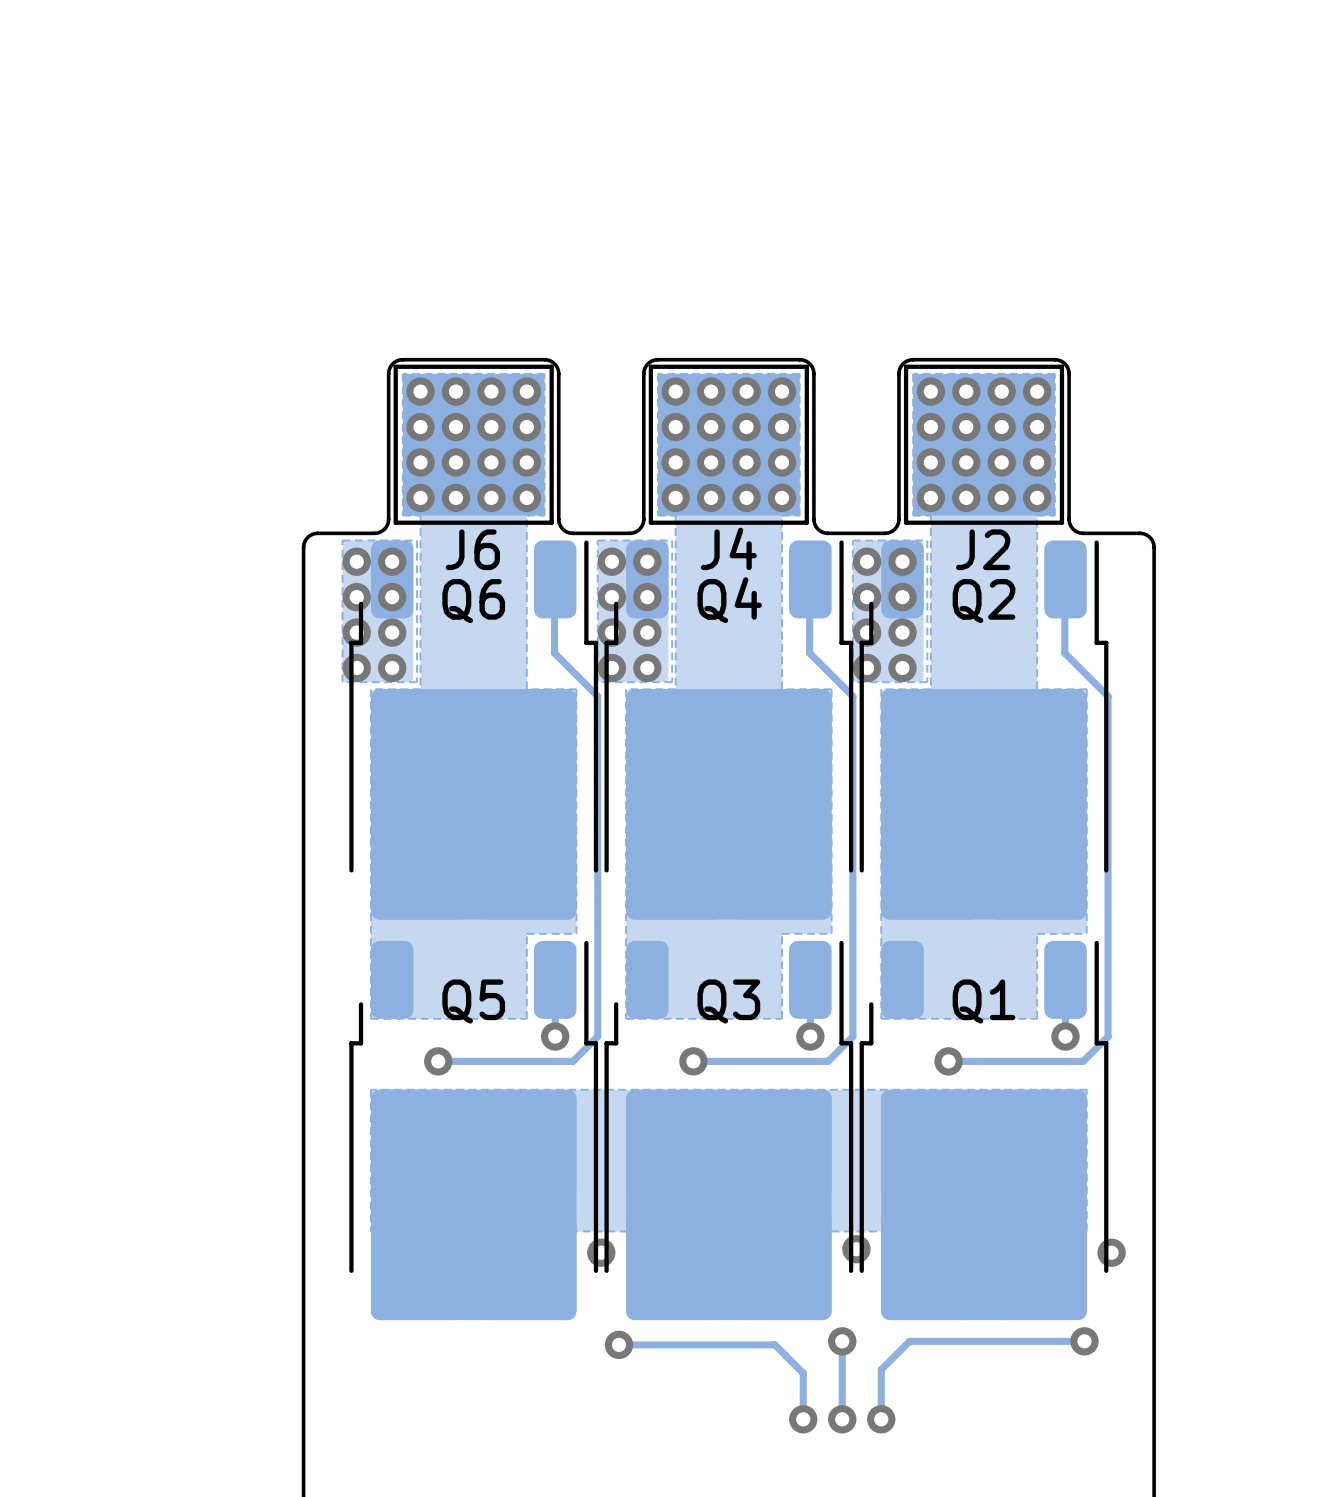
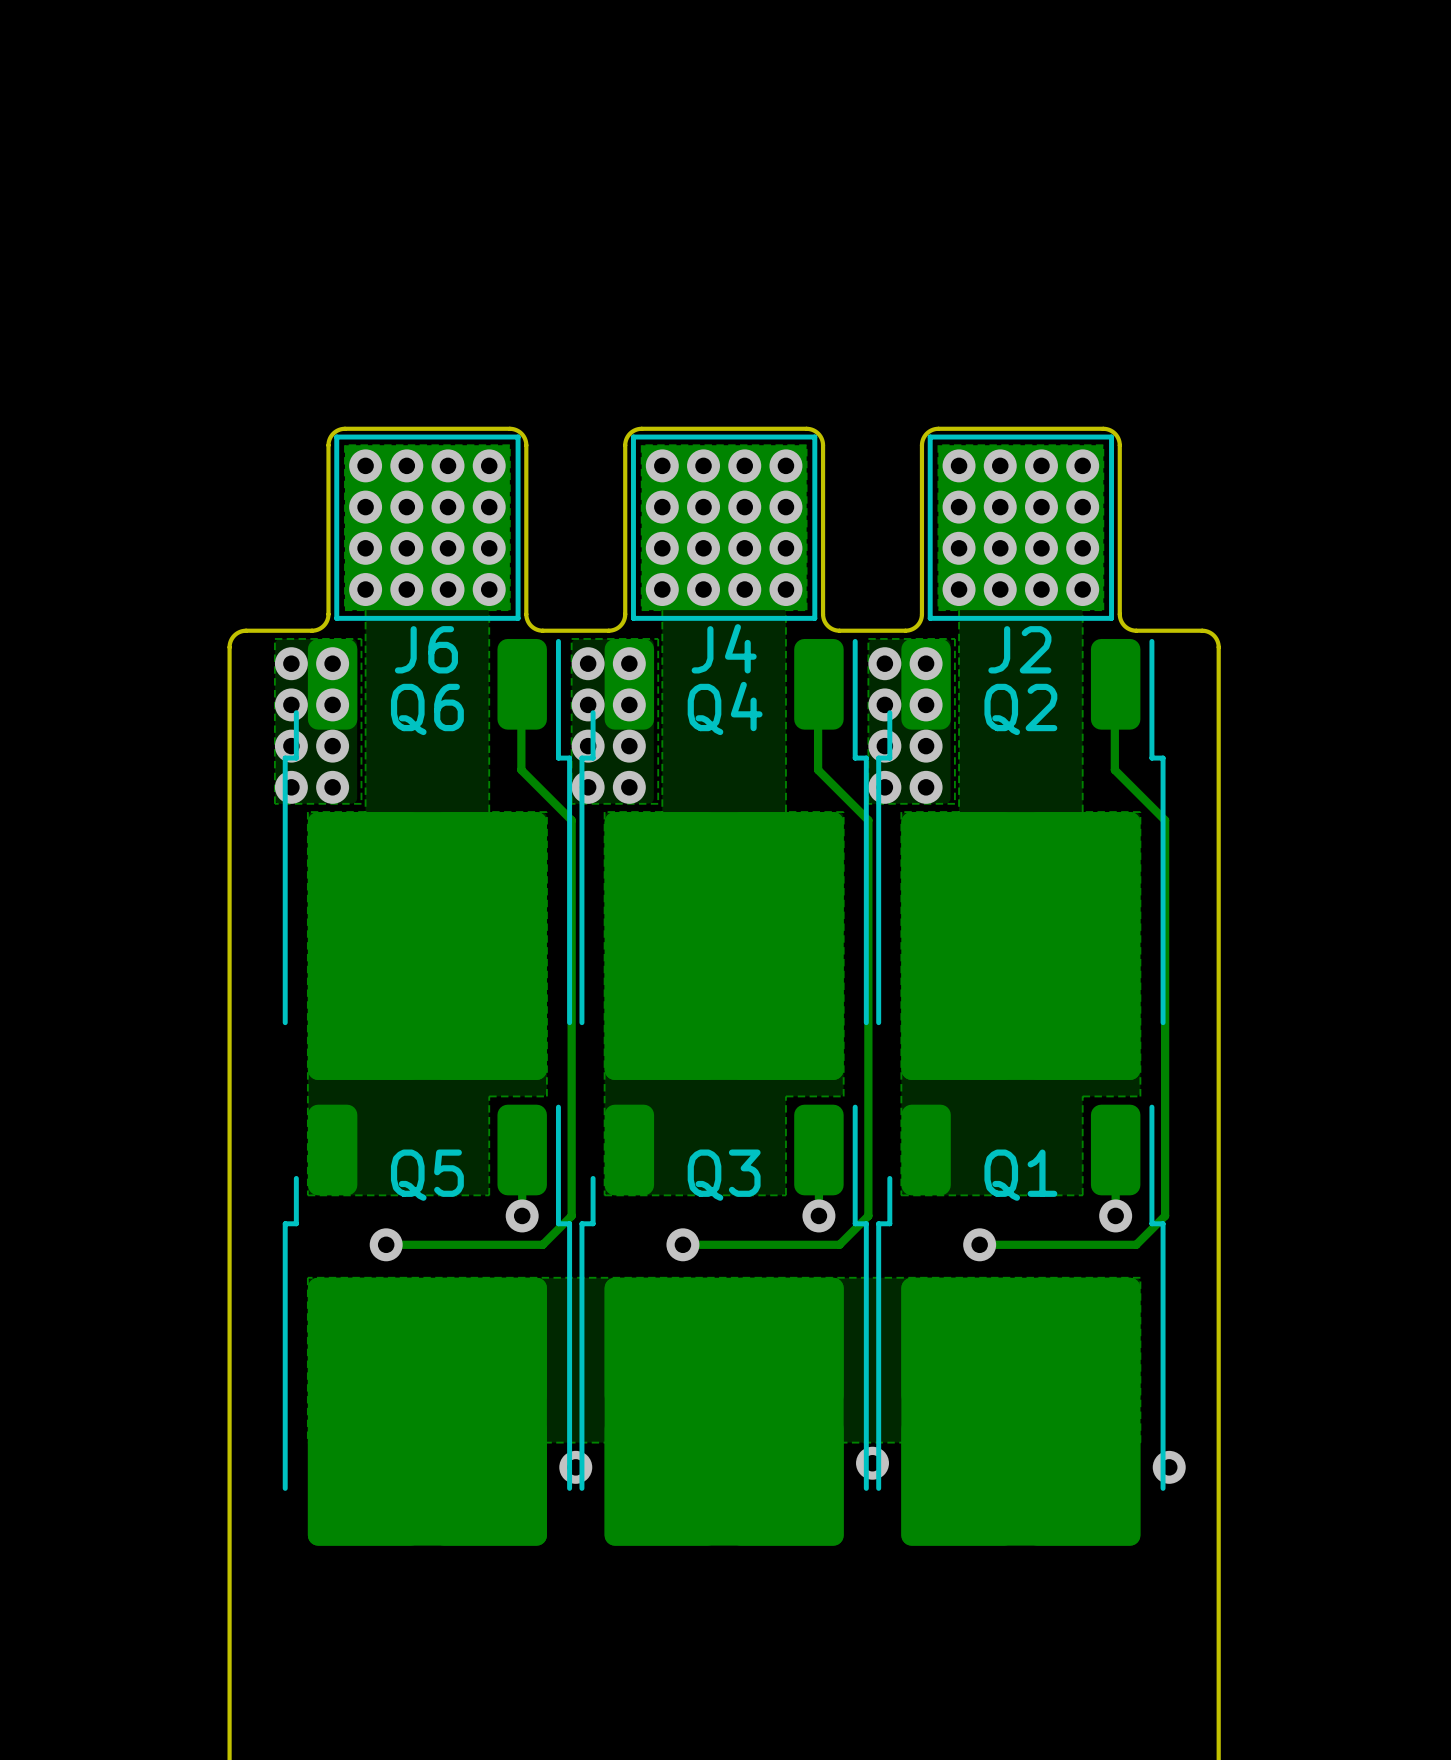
track: (842, 1341) (842, 1419) -> none
via: (842, 1341) -> none
track: (1084, 1341) (909, 1341) (881, 1369) (881, 1419) -> none
via: (1084, 1341) -> none
track: (618, 1344) (774, 1344) (803, 1373) (803, 1419) -> none
via: (618, 1344) -> none
via: (803, 1419) -> none
via: (842, 1419) -> none
via: (881, 1419) -> none

